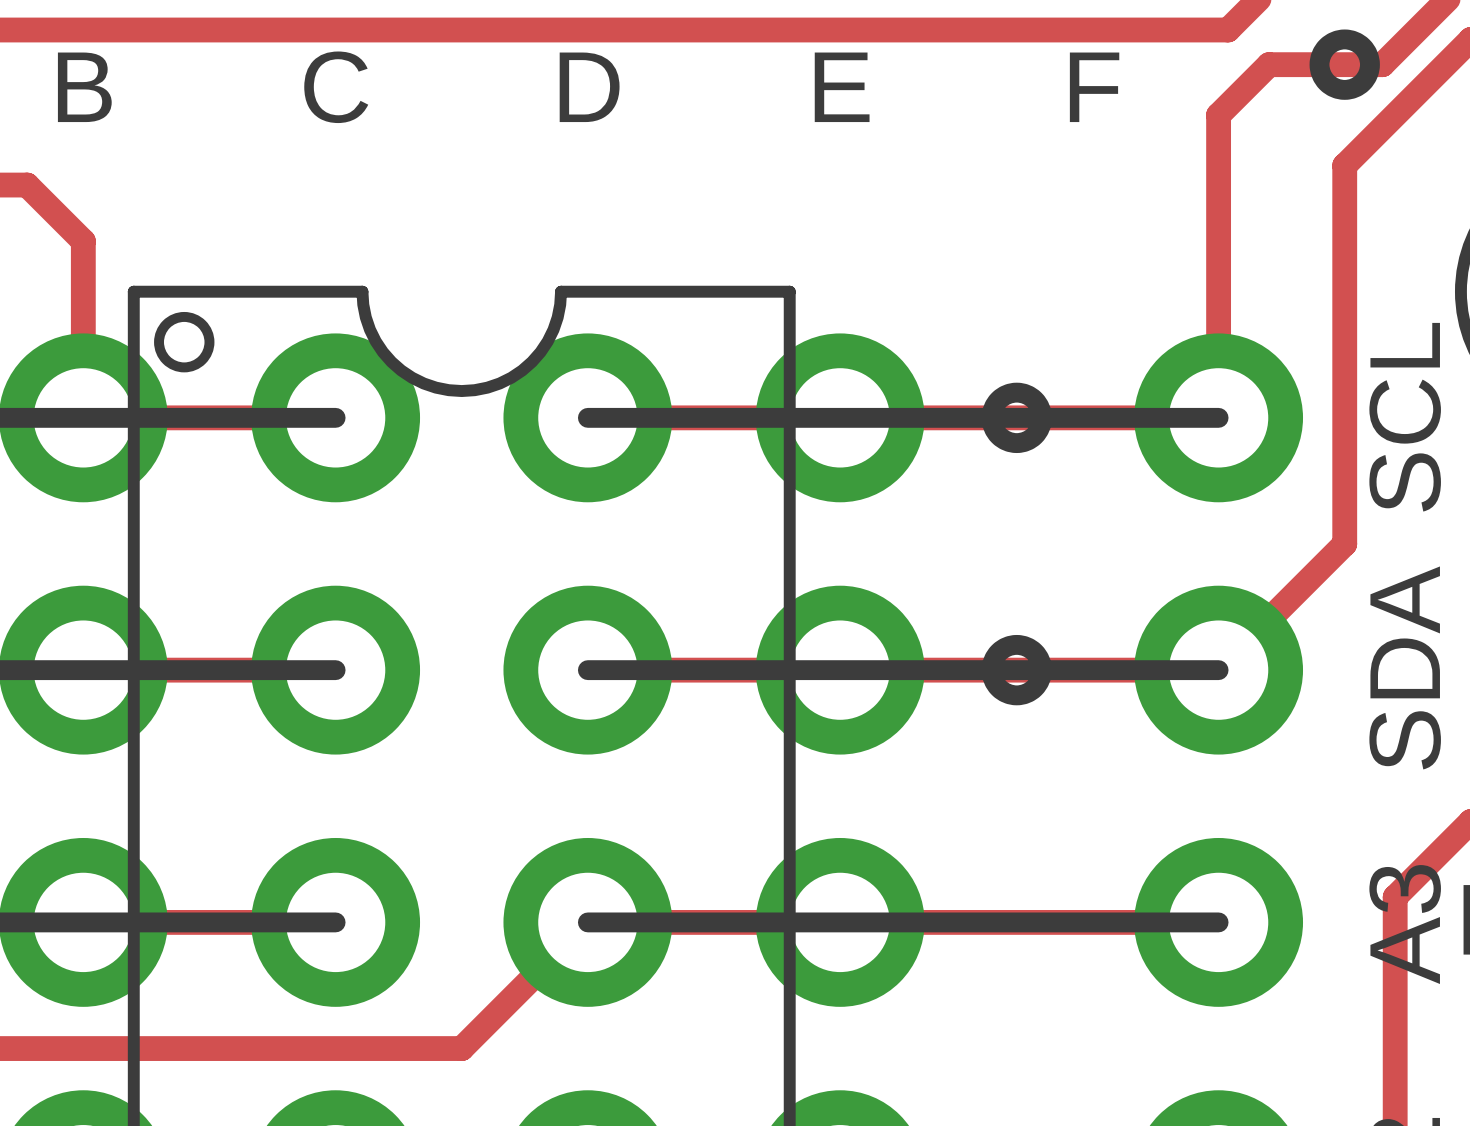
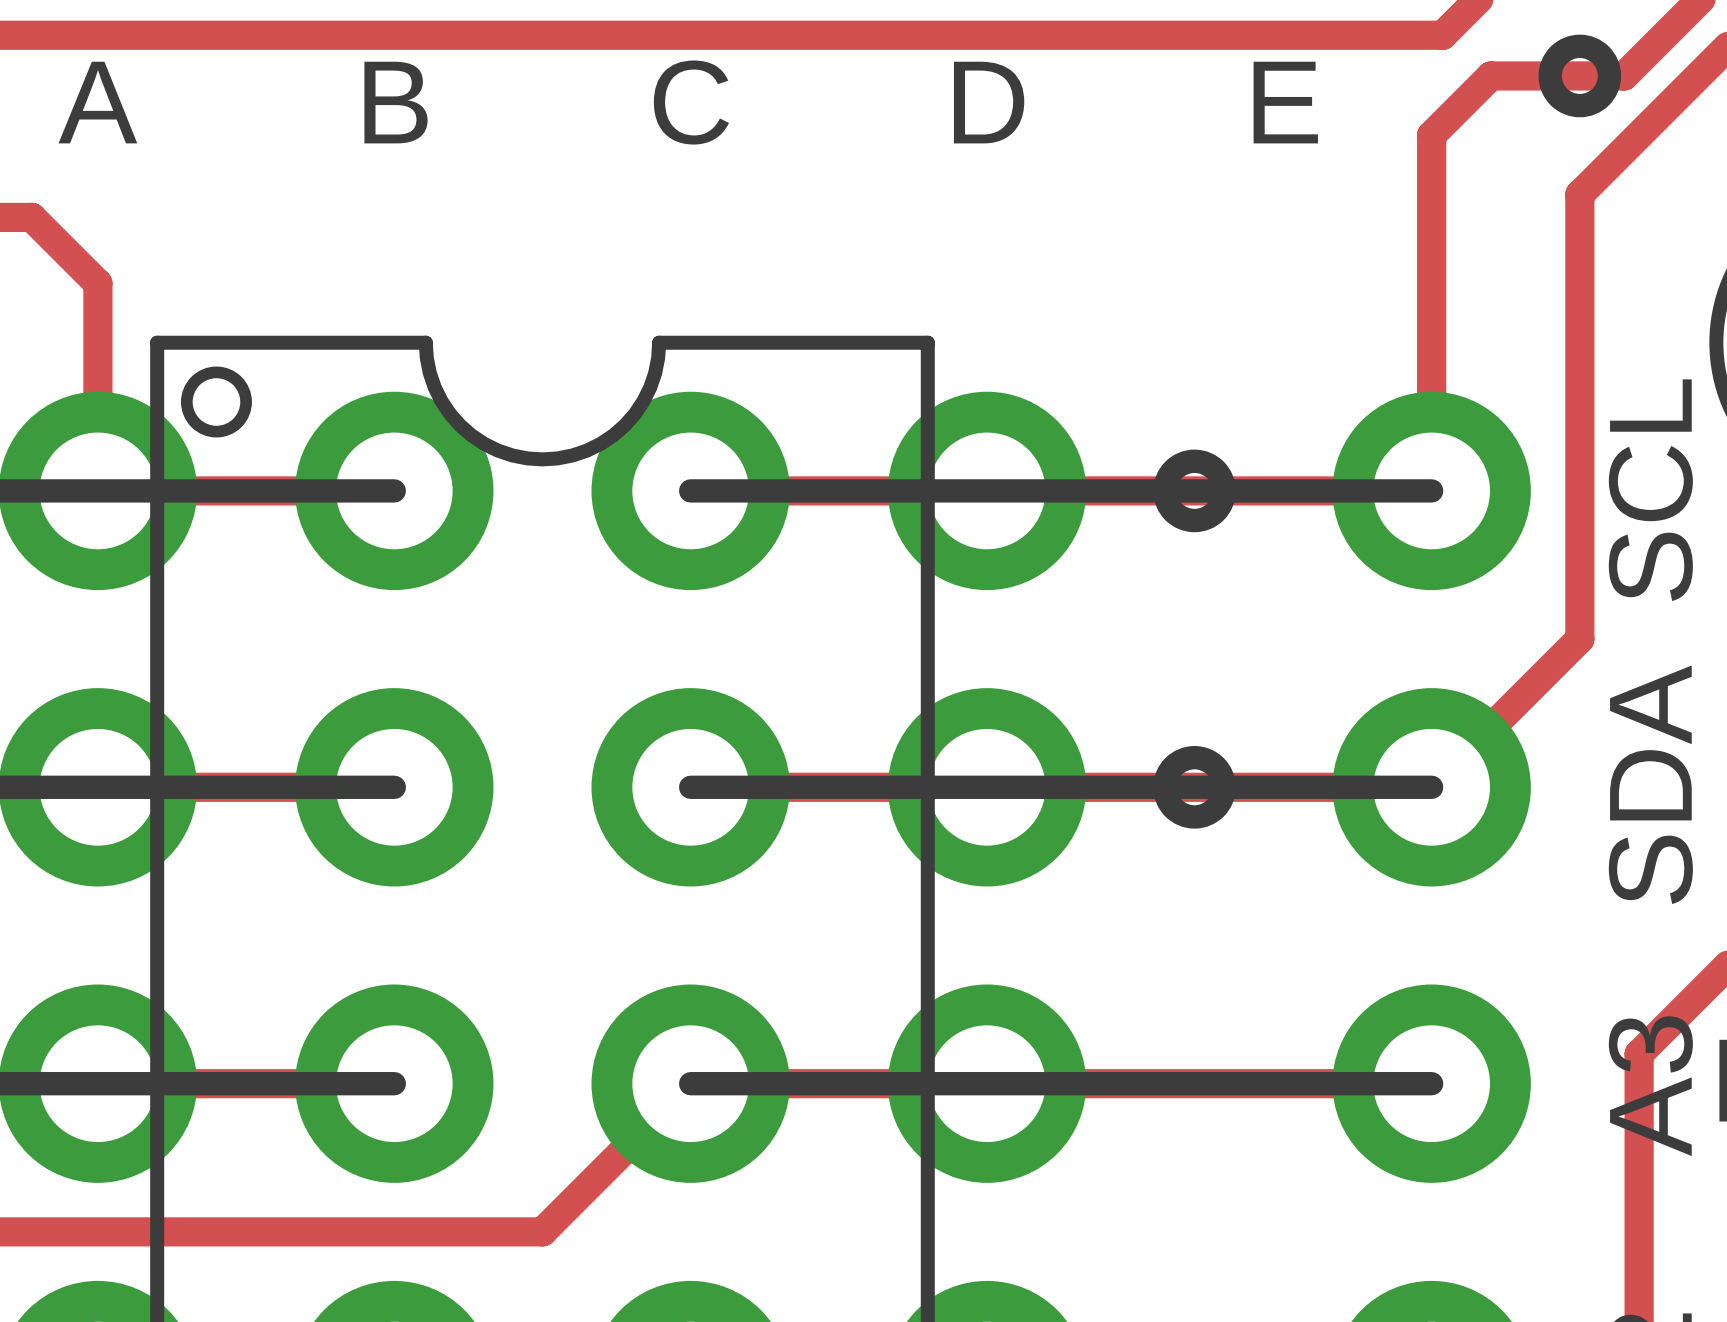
text: B (84, 87) -> A (97, 102)
text: C (336, 87) -> B (396, 102)
text: D (589, 87) -> C (691, 102)
text: E (842, 87) -> D (989, 102)
text: F (1094, 87) -> E (1285, 102)

